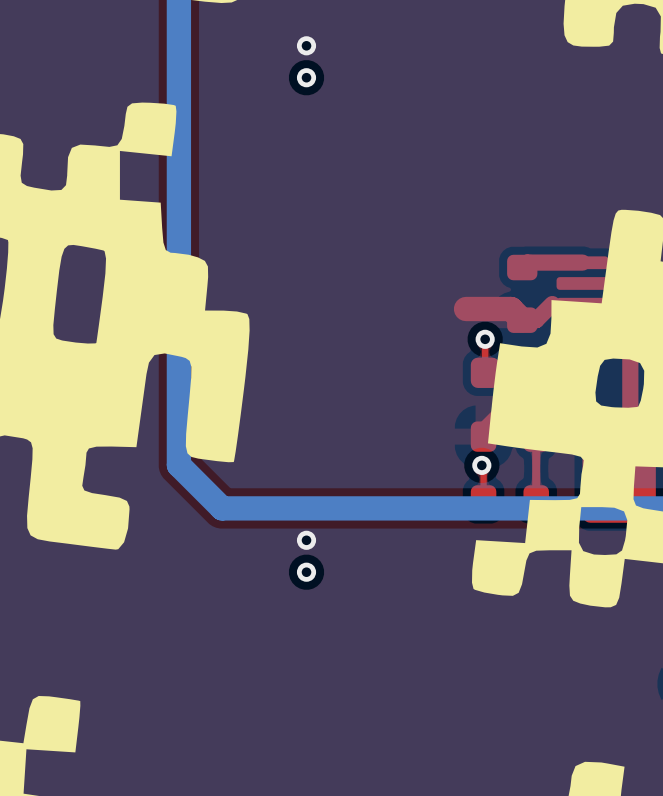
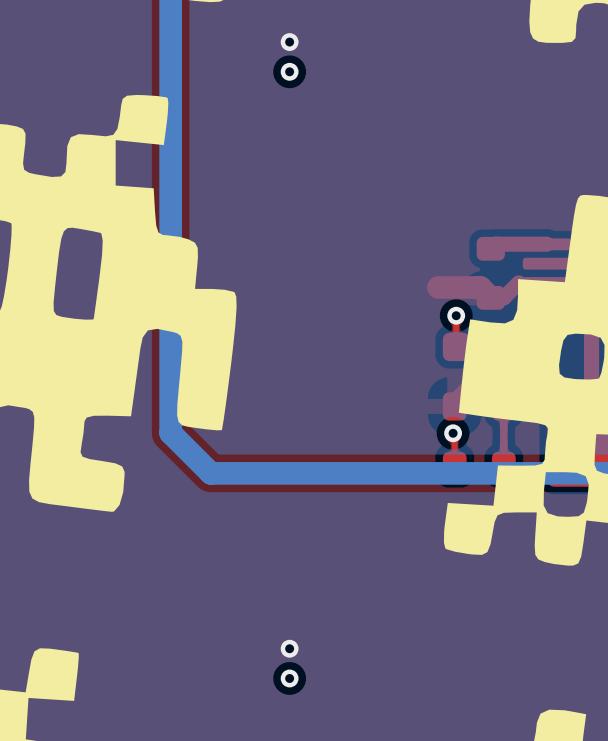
via: (306, 540) -> none
via: (306, 572) -> none
via: none -> (289, 648)
via: none -> (289, 678)

